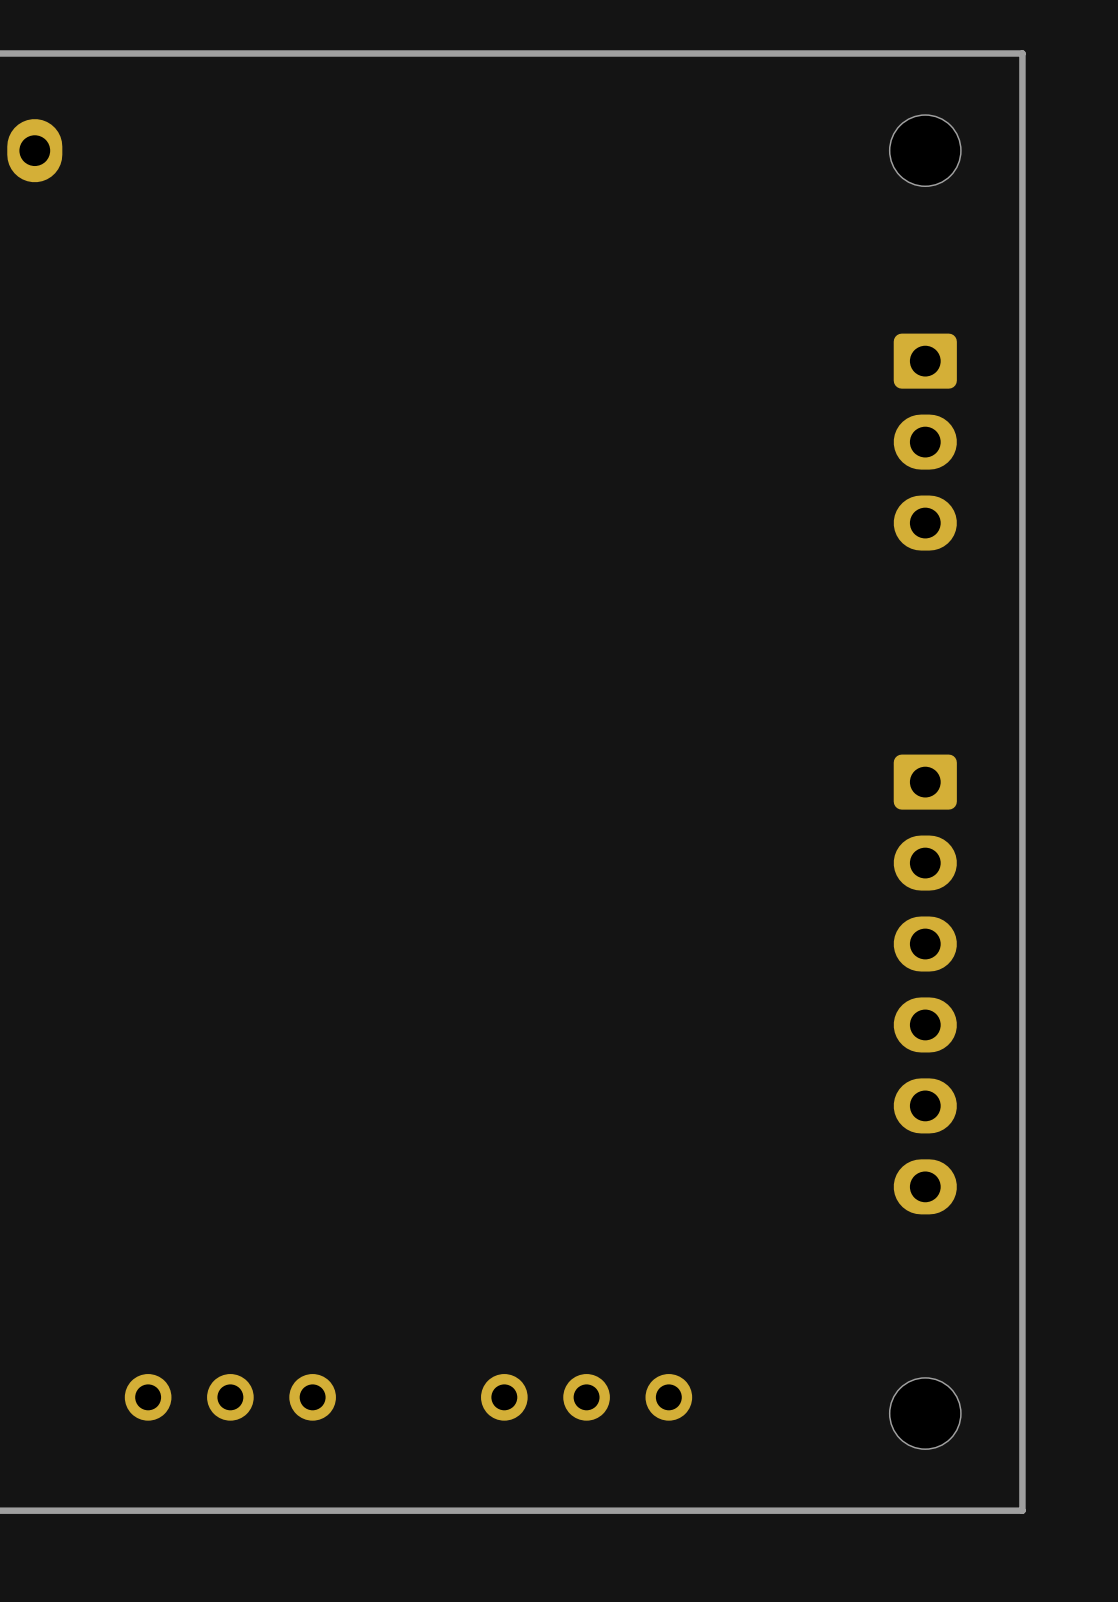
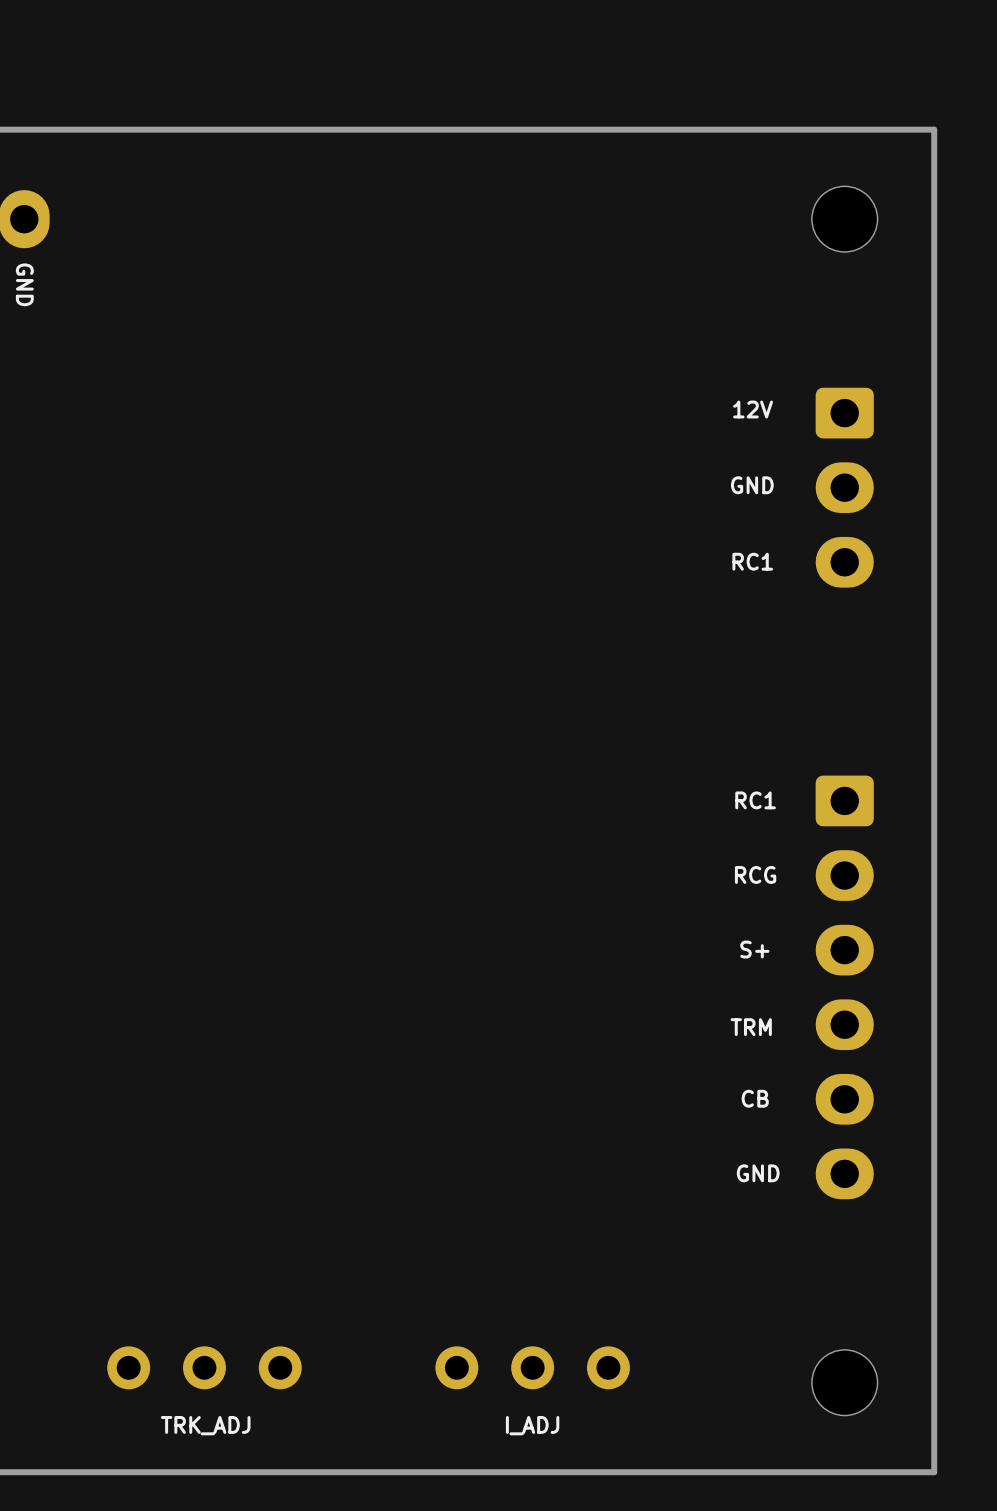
text: none -> GND (24, 284)
text: none -> 12V (753, 409)
text: none -> GND (752, 485)
text: none -> RC1 (752, 561)
text: none -> RC1 (755, 800)
text: none -> RCG (755, 874)
text: none -> S+ (754, 949)
text: none -> TRM (751, 1027)
text: none -> CB (755, 1098)
text: none -> GND (758, 1173)
text: none -> TRK_ADJ (205, 1425)
text: none -> I_ADJ (532, 1425)

